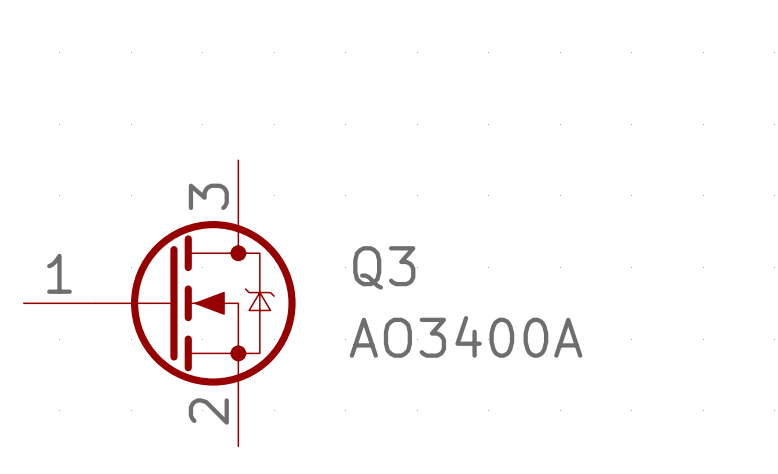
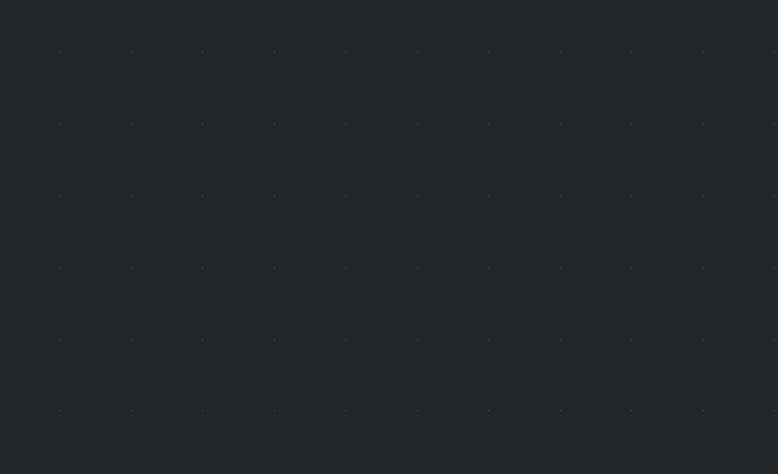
Q3: AO3400A (159, 303) -> none

